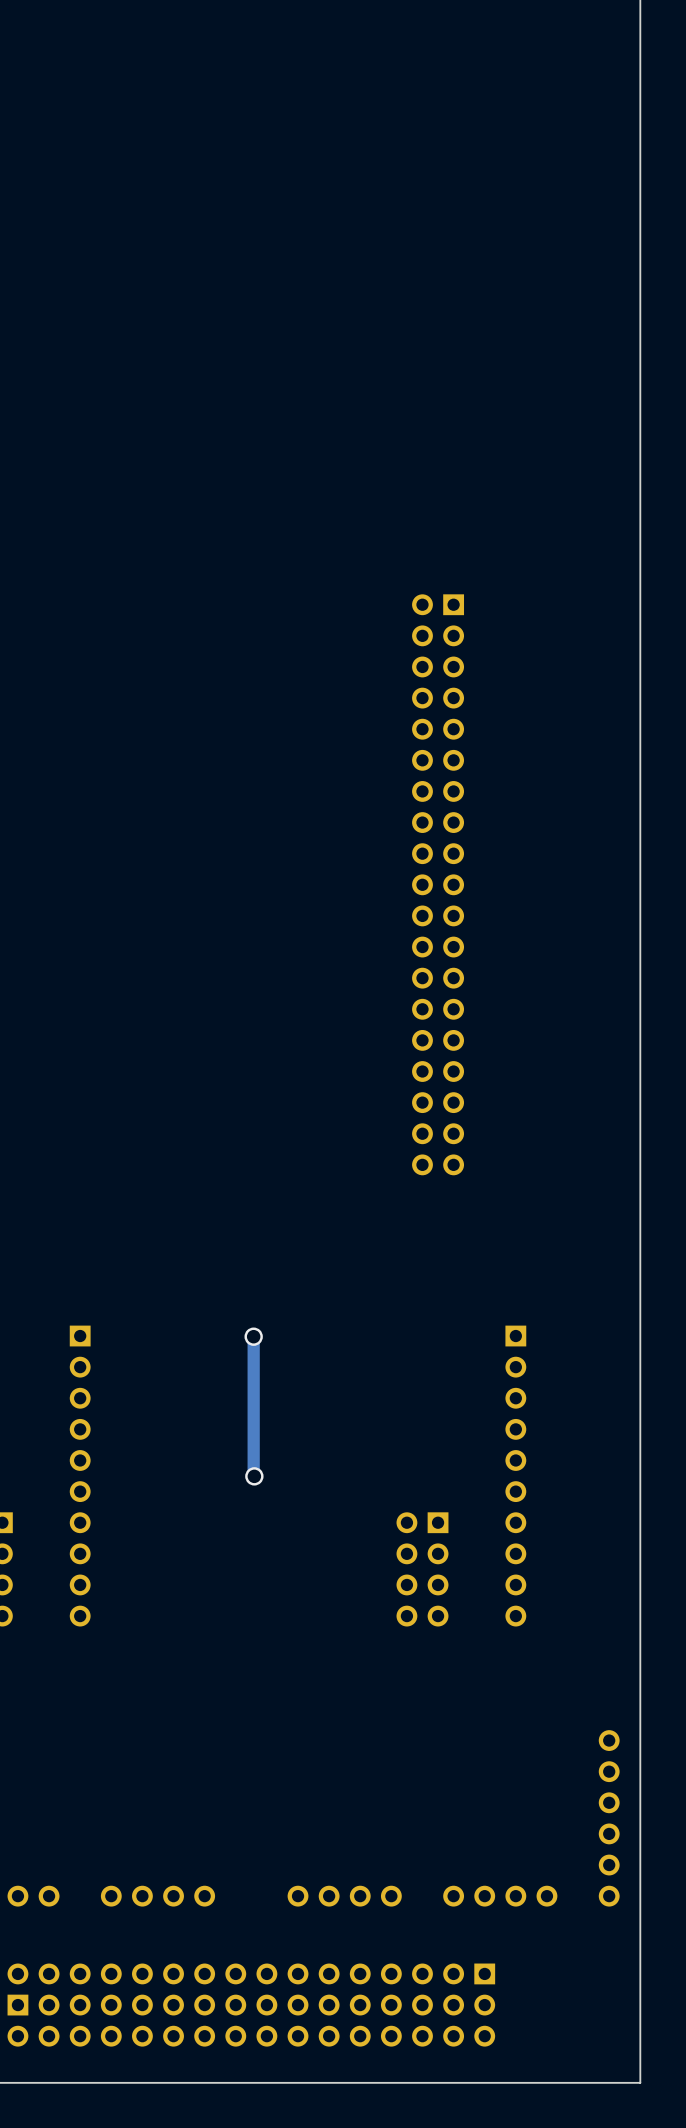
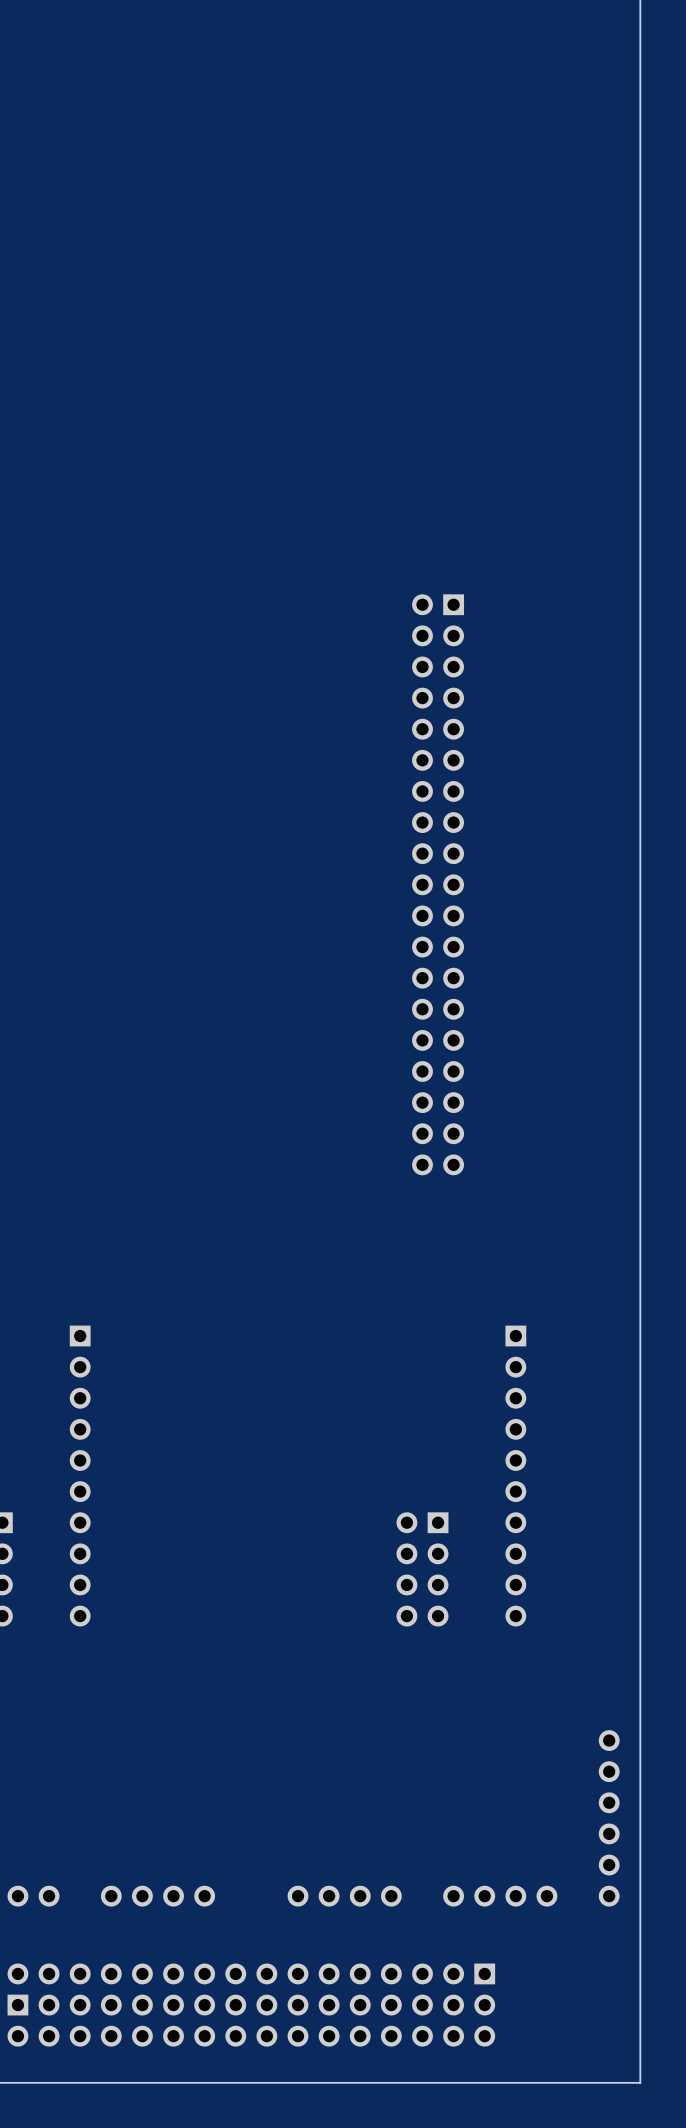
track: (253, 1336) (254, 1476) -> none
via: (253, 1336) -> none
via: (254, 1476) -> none

